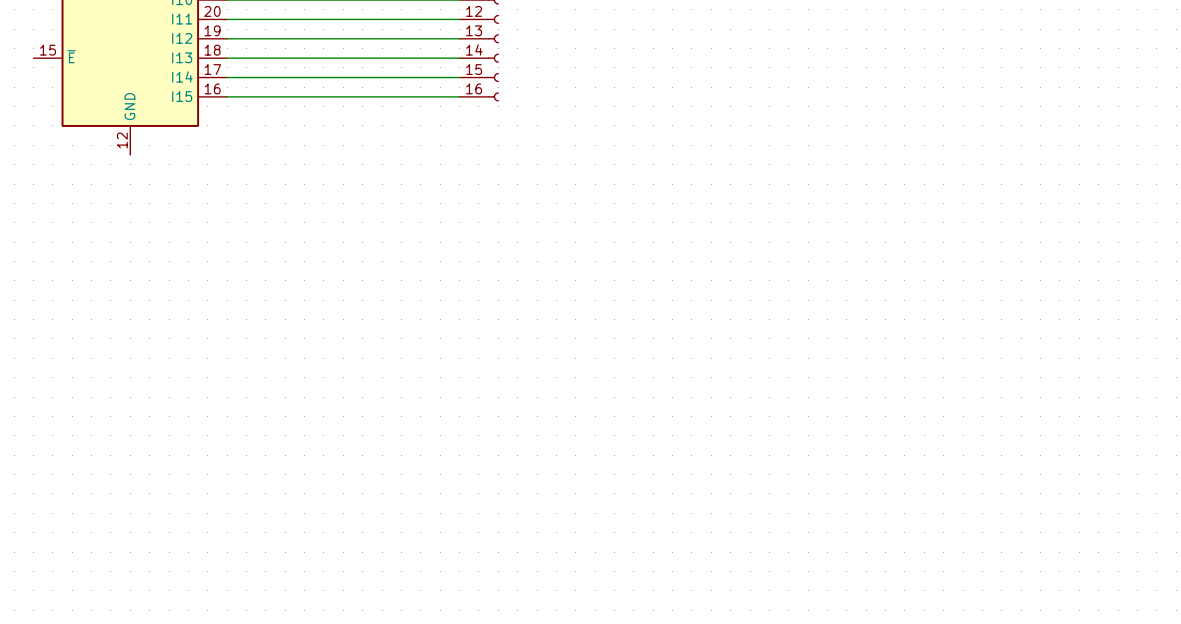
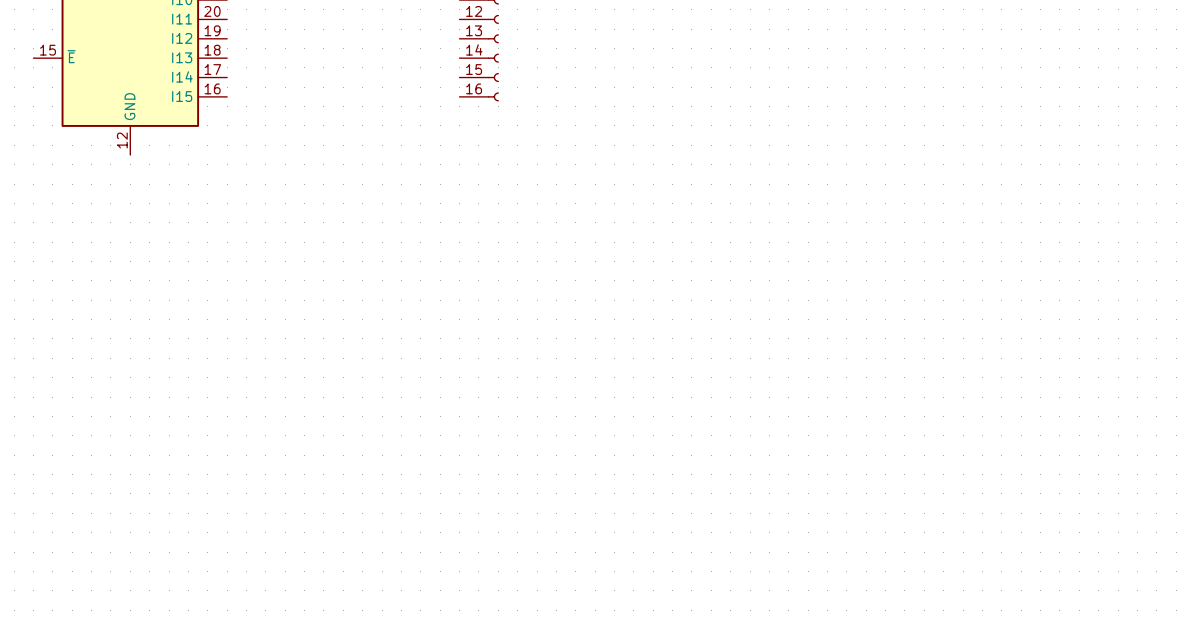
wire: (227, 0) (459, 0) -> none
wire: (227, 19) (459, 19) -> none
wire: (227, 38) (459, 38) -> none
wire: (227, 58) (459, 58) -> none
wire: (227, 77) (459, 77) -> none
wire: (227, 96) (459, 96) -> none

